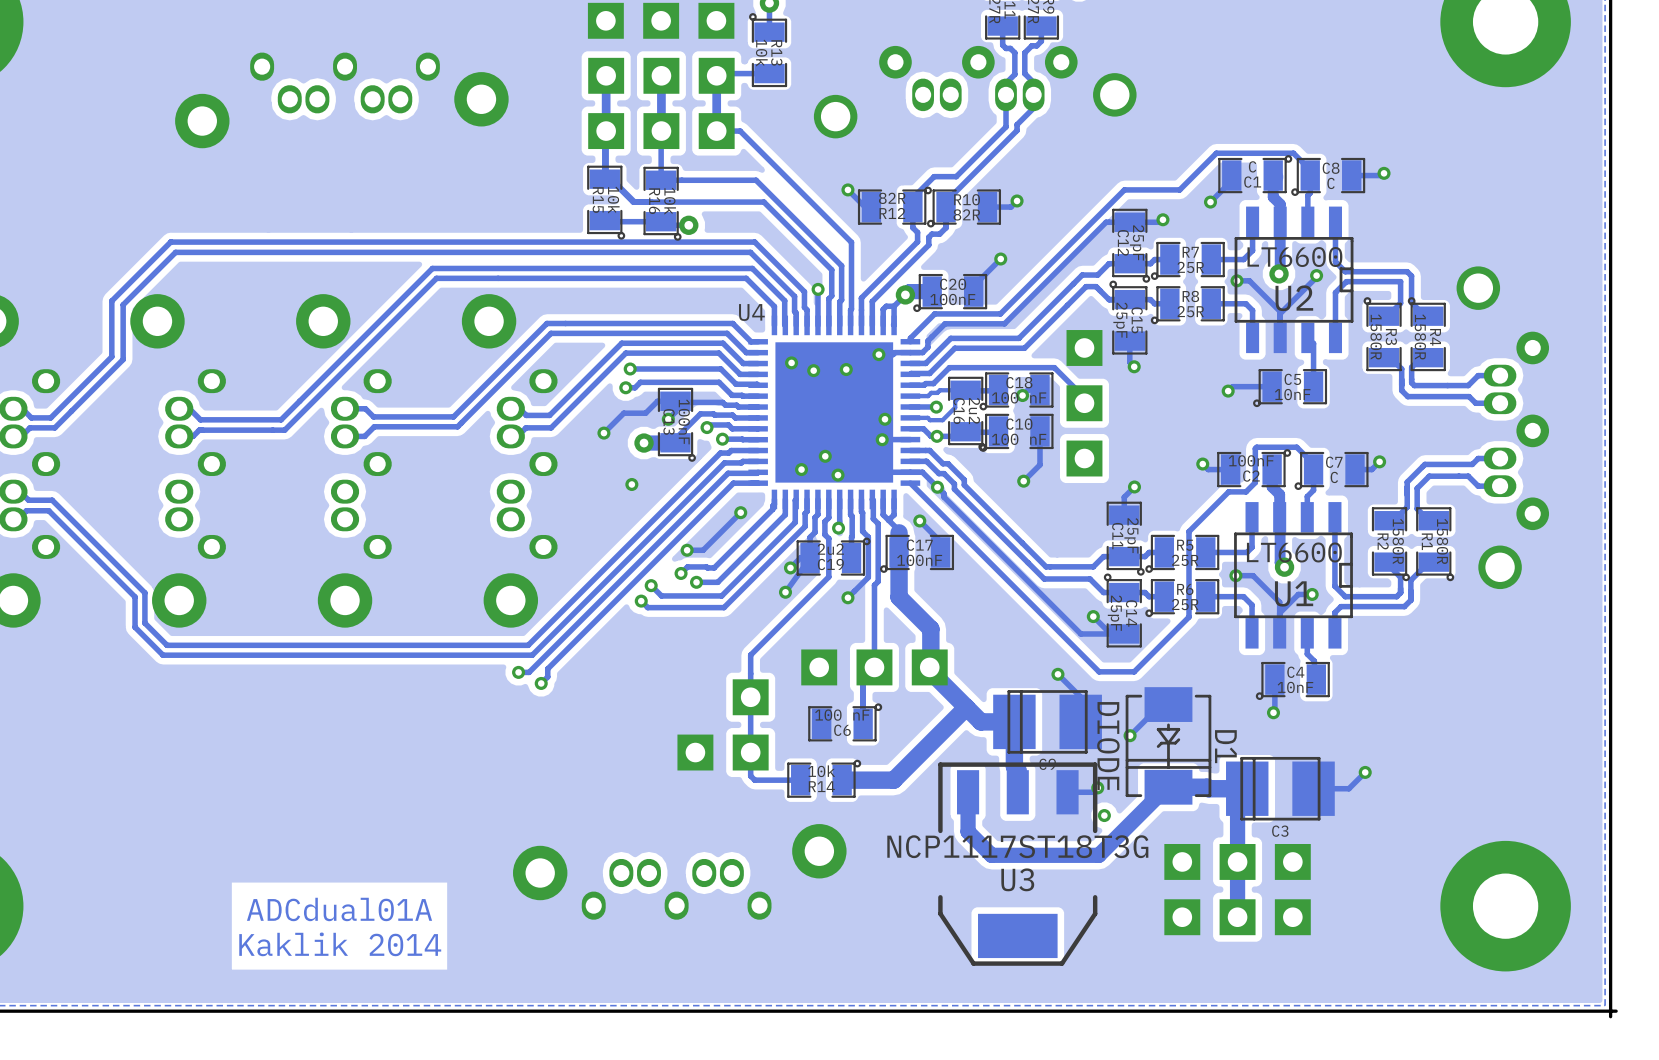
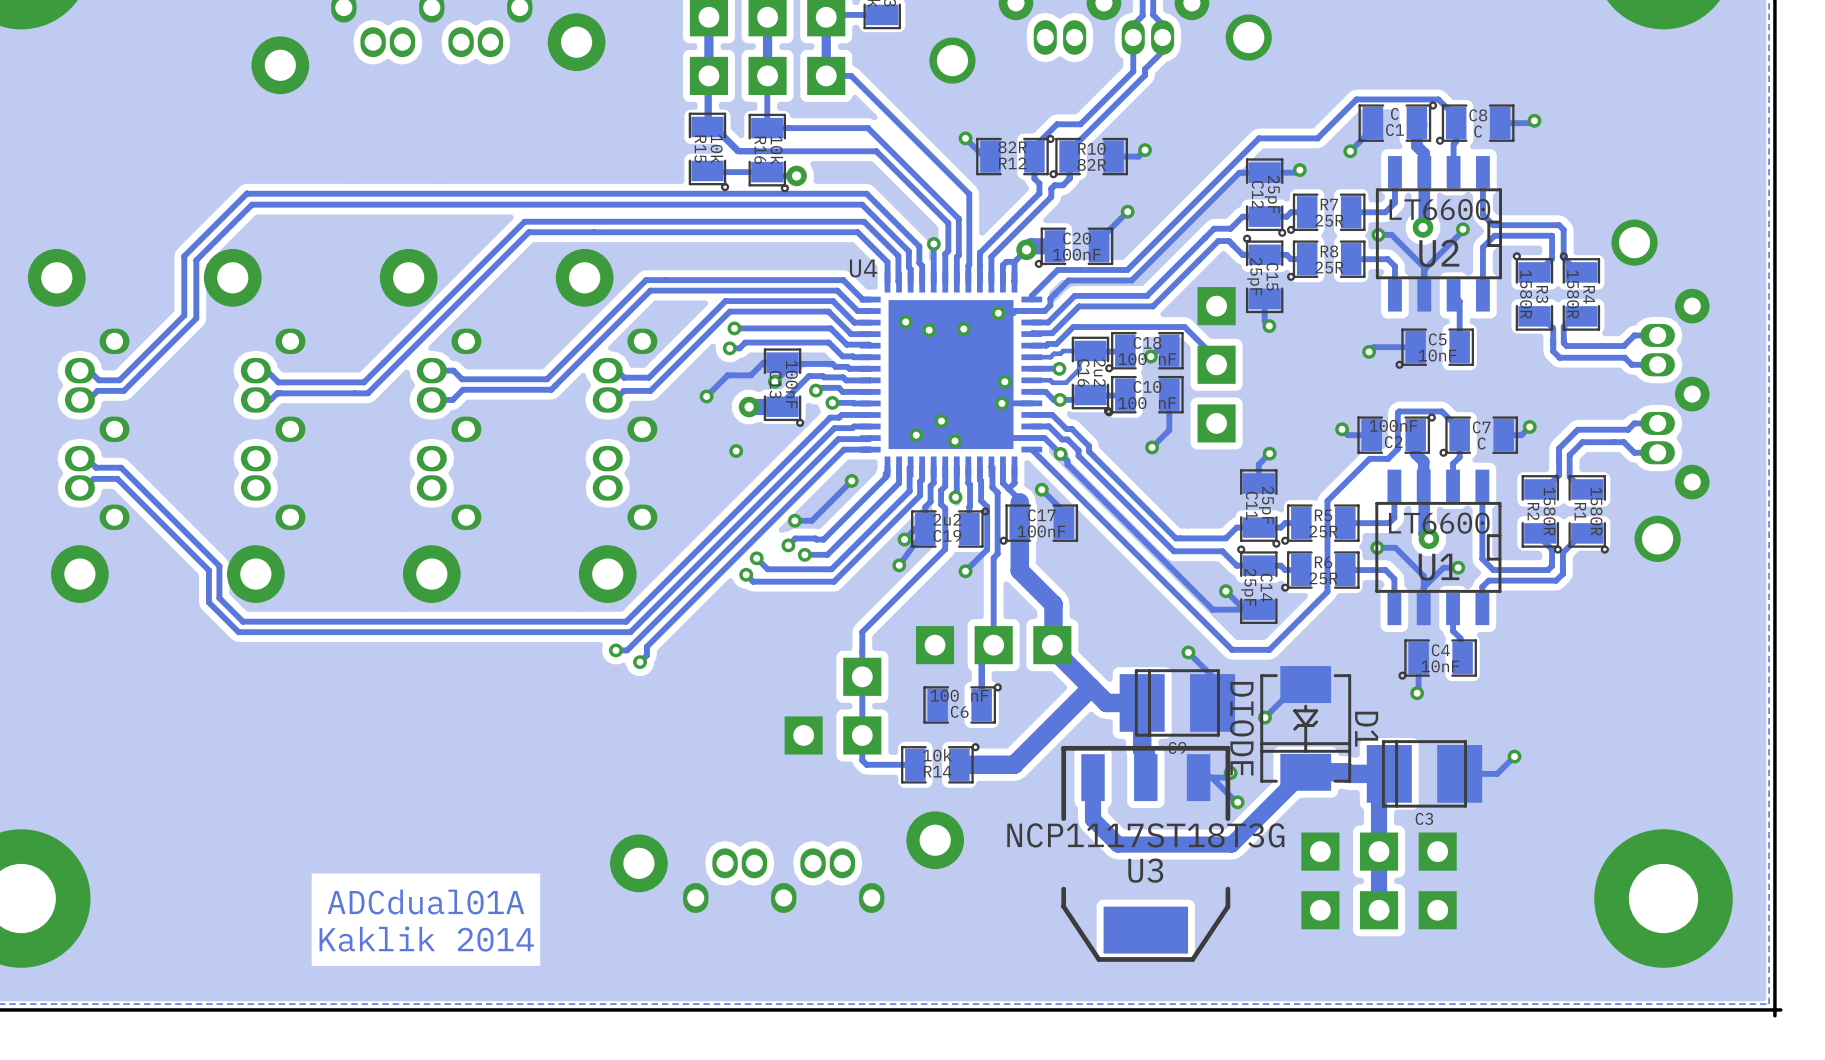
track: none -> (1211, 777) (1238, 804)

